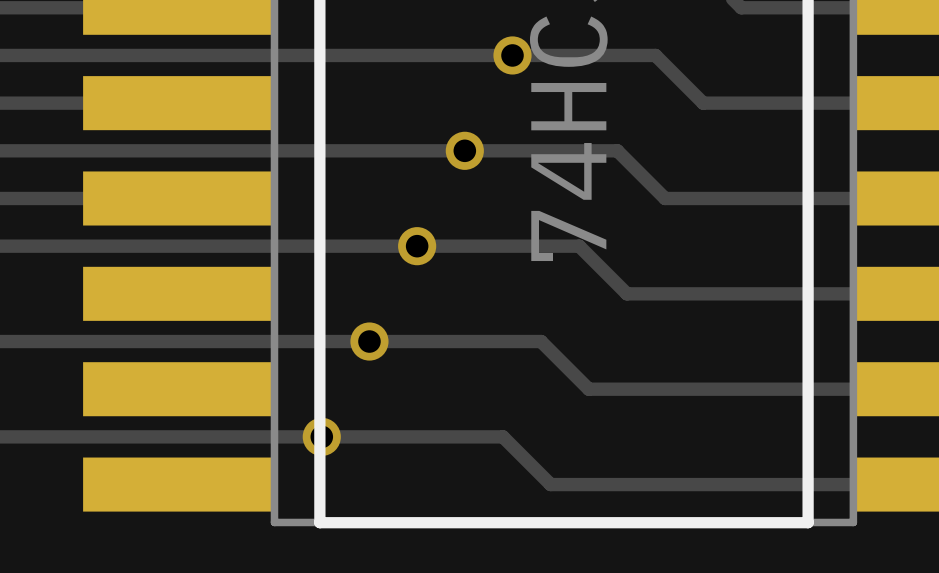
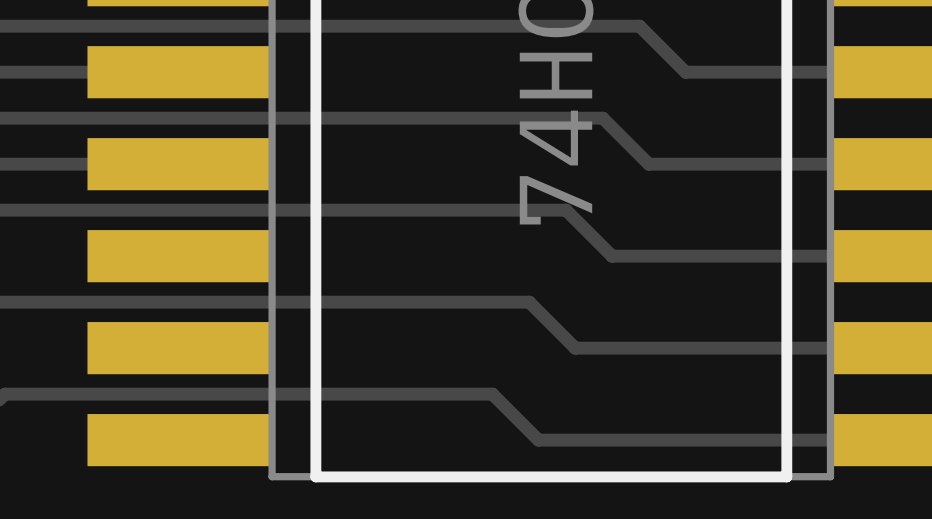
via: (512, 55) -> none
via: (464, 150) -> none
via: (417, 246) -> none
via: (369, 341) -> none
via: (321, 436) -> none

